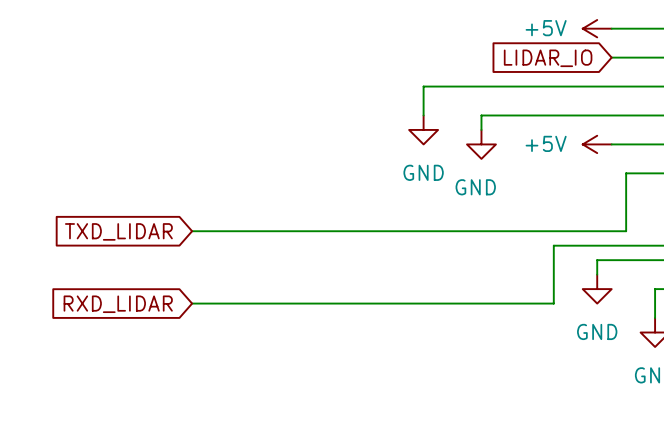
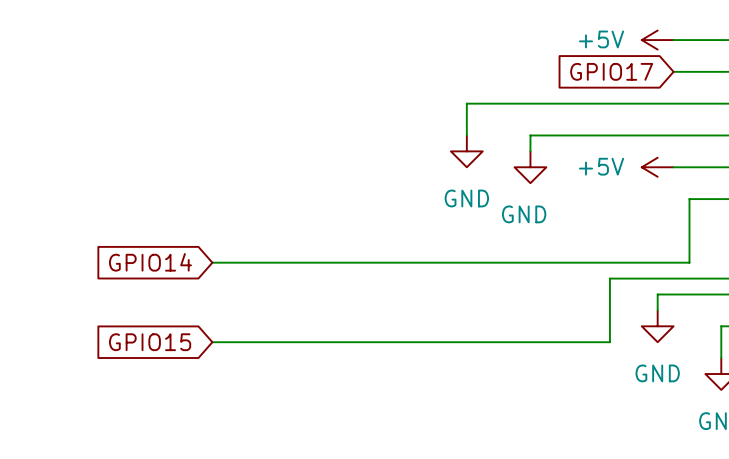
global label: LIDAR_IO (548, 58) -> GPIO17 (611, 71)
global label: TXD_LIDAR (118, 231) -> GPIO14 (150, 262)
global label: RXD_LIDAR (118, 304) -> GPIO15 (150, 342)

